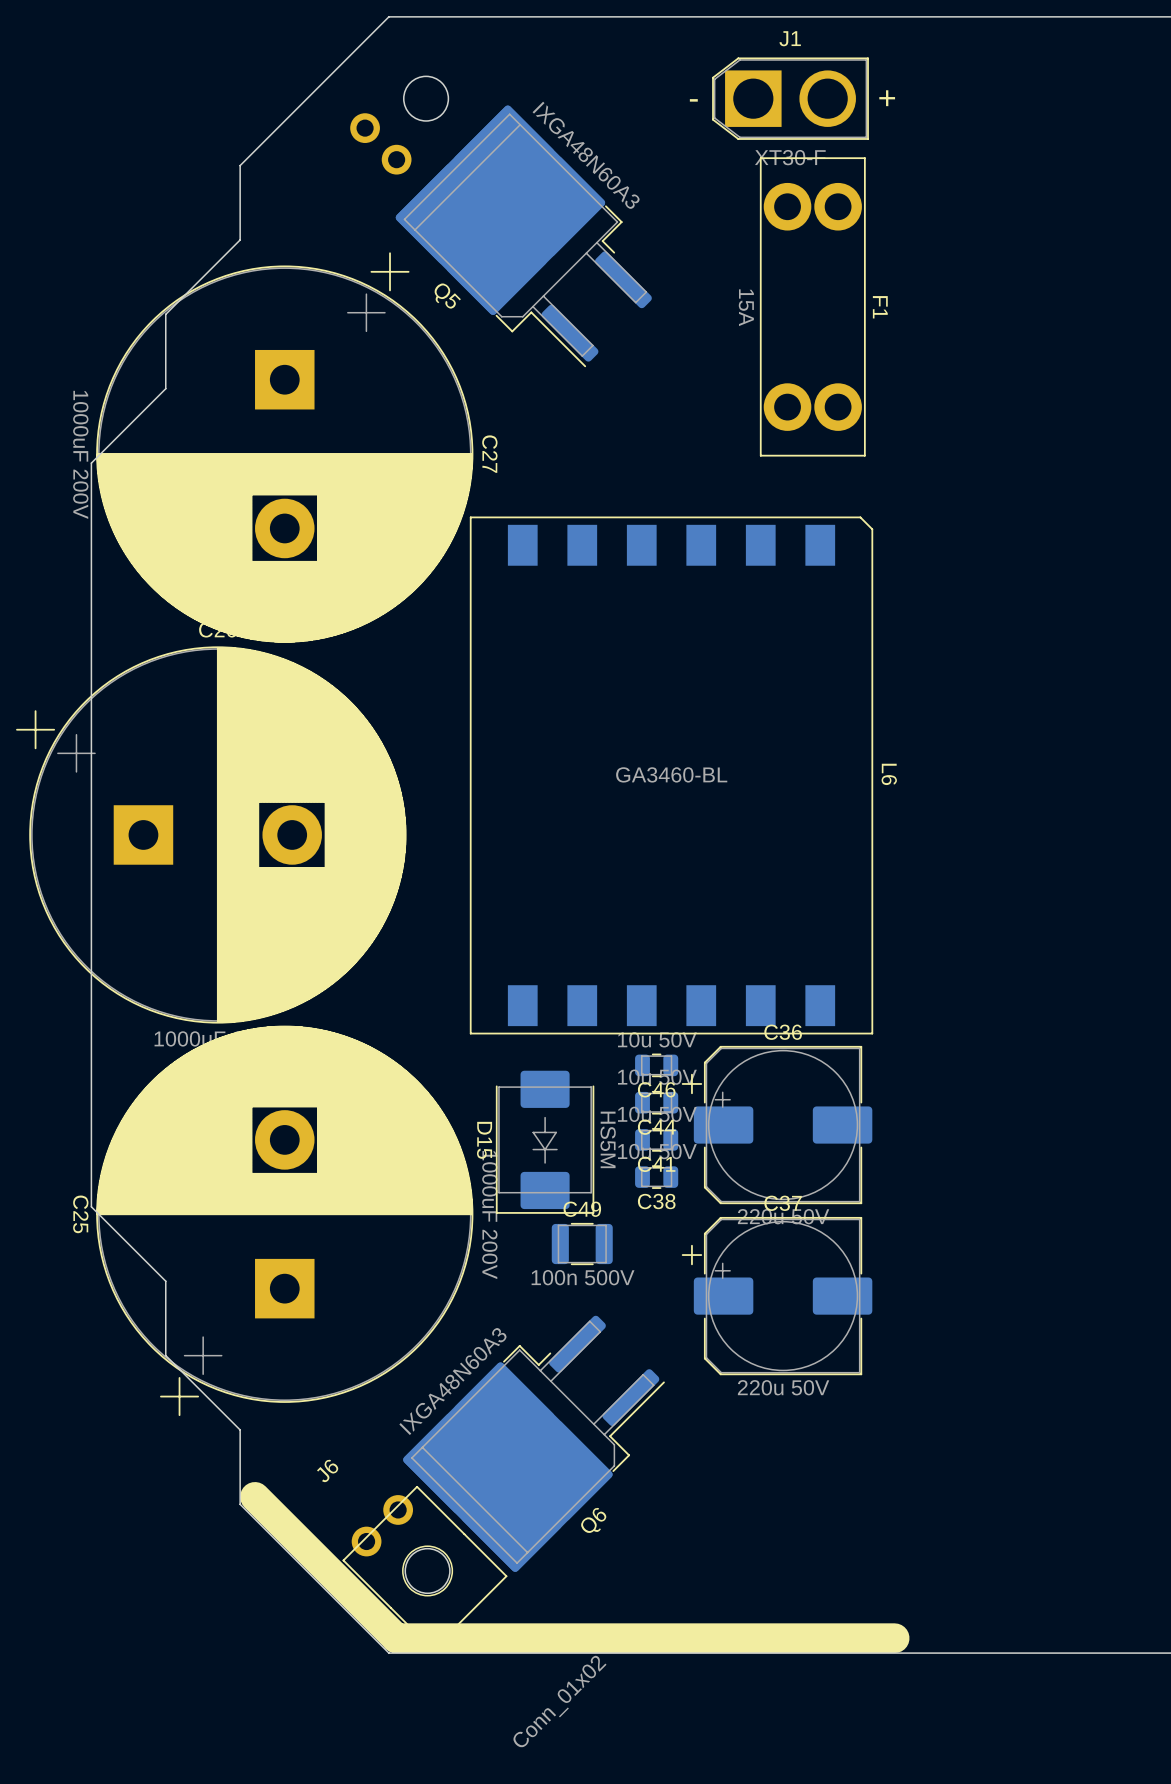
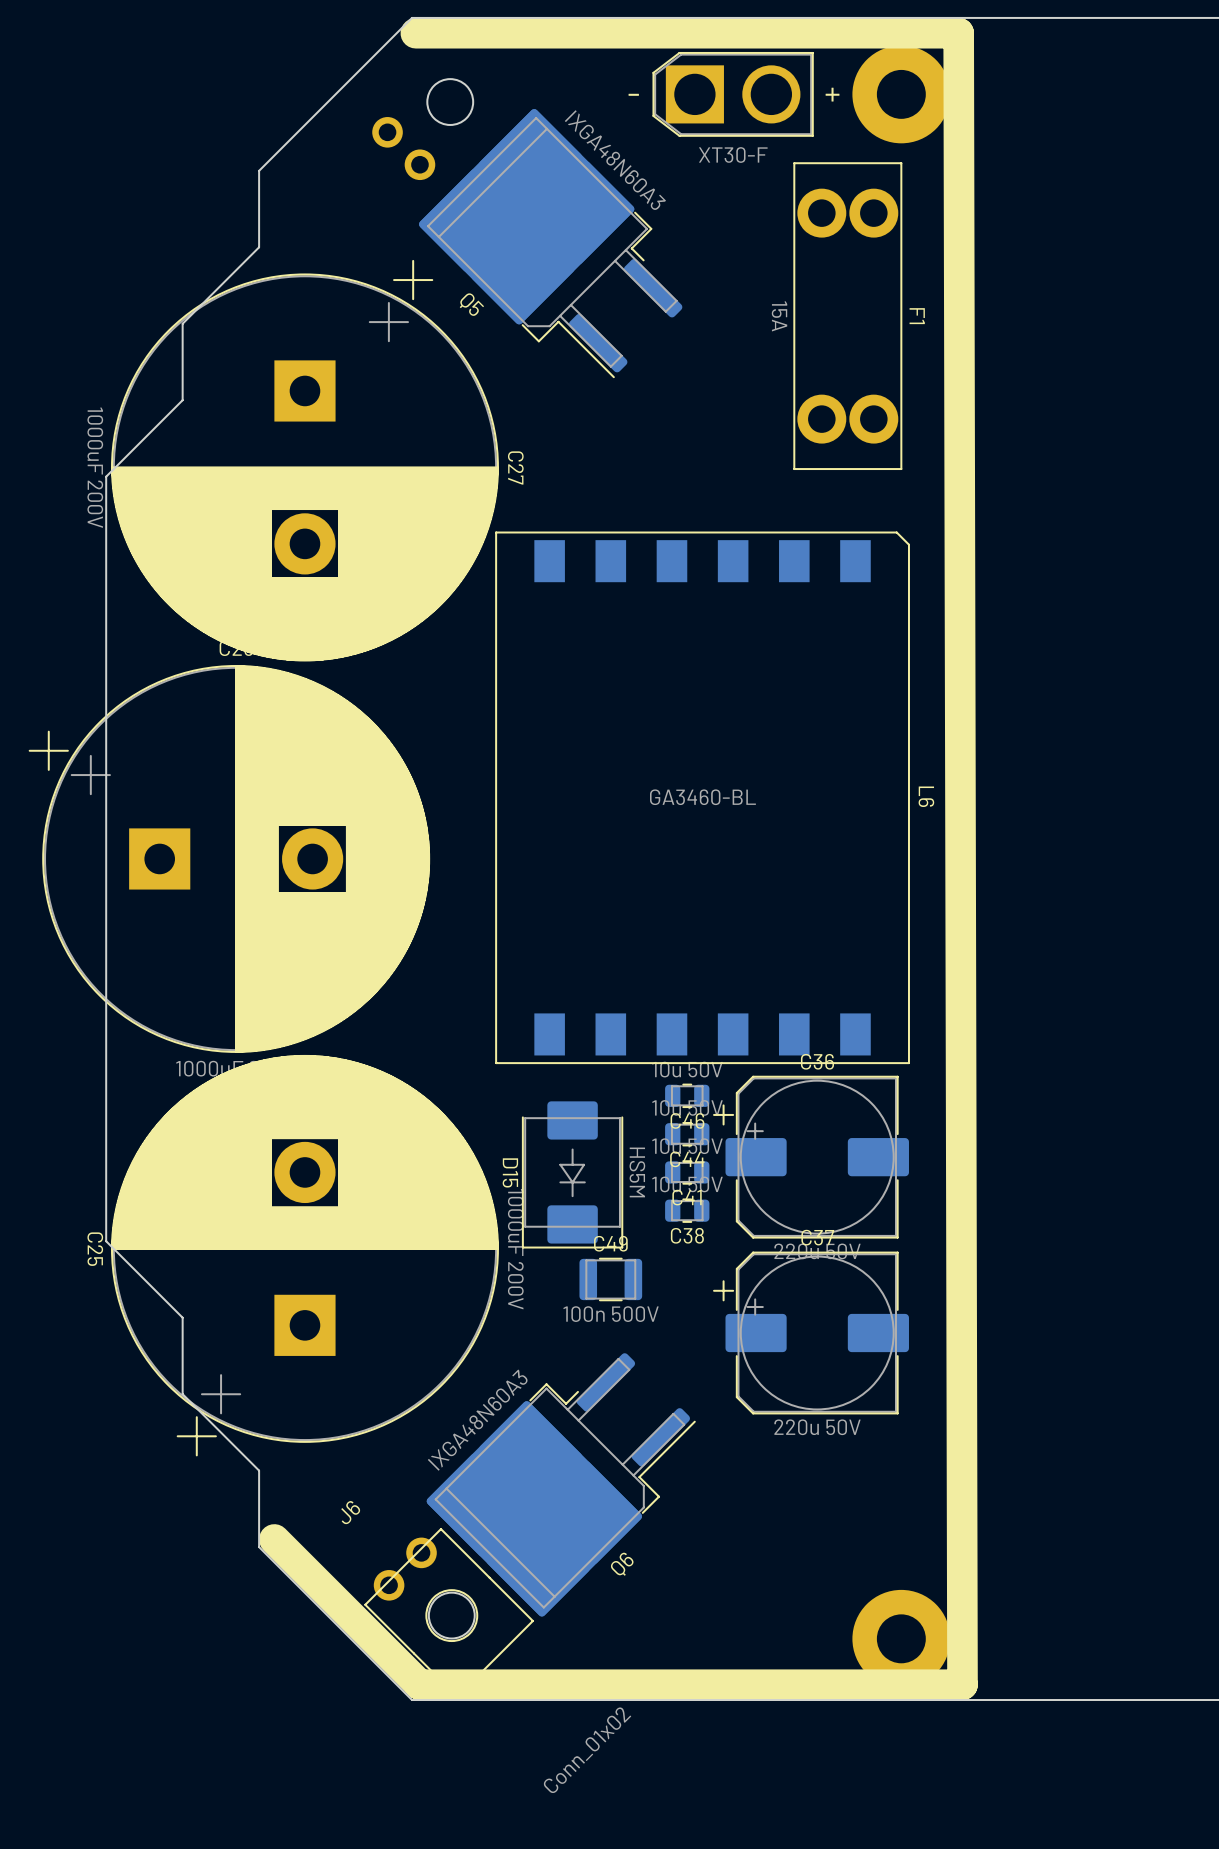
line: none -> (415, 33) (958, 33) (962, 1684) (931, 1684)
part: none -> (901, 94)
J1 position: (790, 98) -> (733, 94)
part: none -> (901, 1638)

